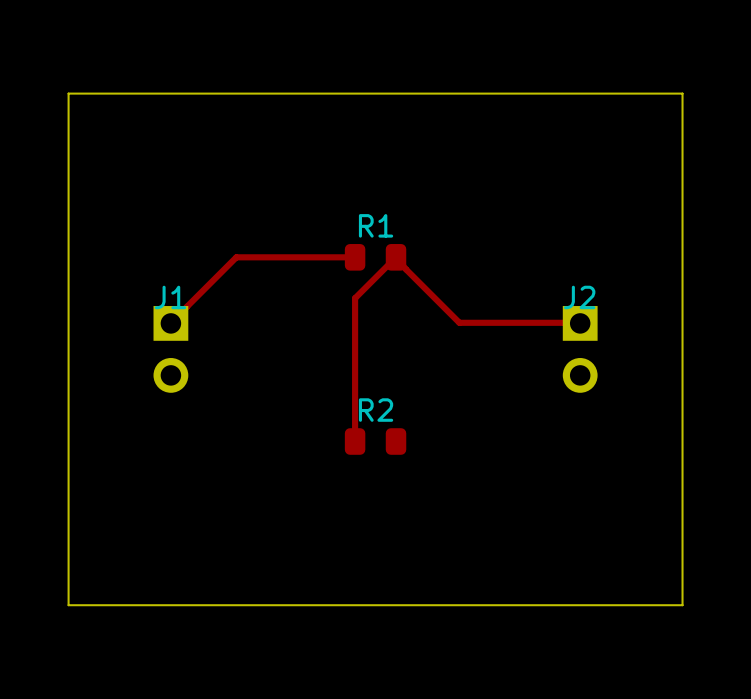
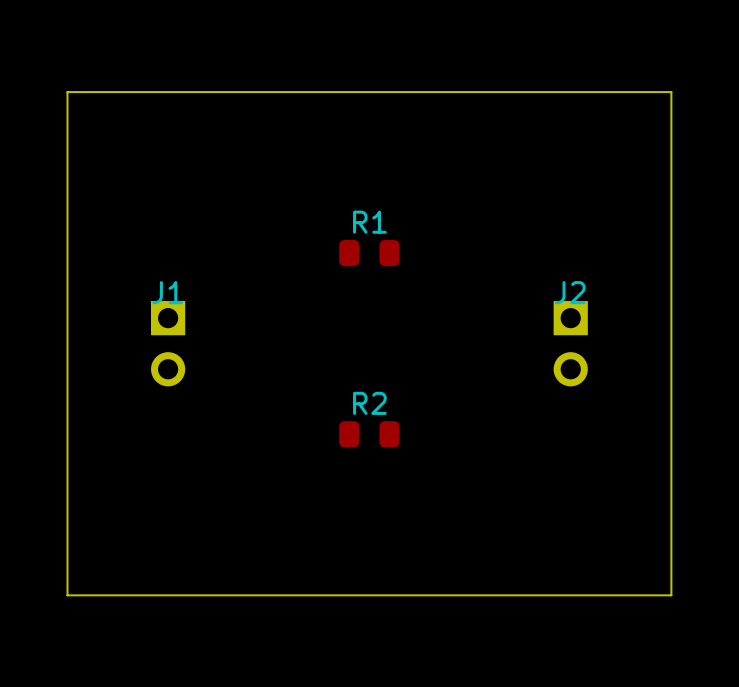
track: (355, 257) (236, 257) (170, 323) -> none
track: (580, 323) (459, 322) (396, 257) (355, 298) (355, 441) -> none

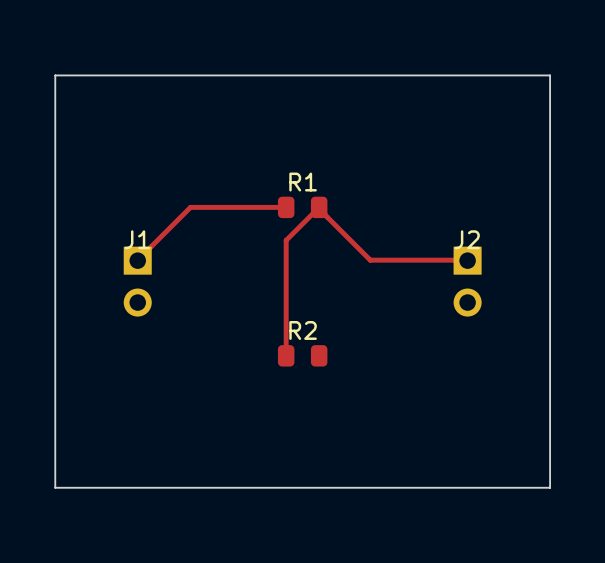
track: none -> (286, 207) (190, 207) (137, 260)
track: none -> (467, 260) (370, 260) (319, 207) (286, 240) (286, 355)

